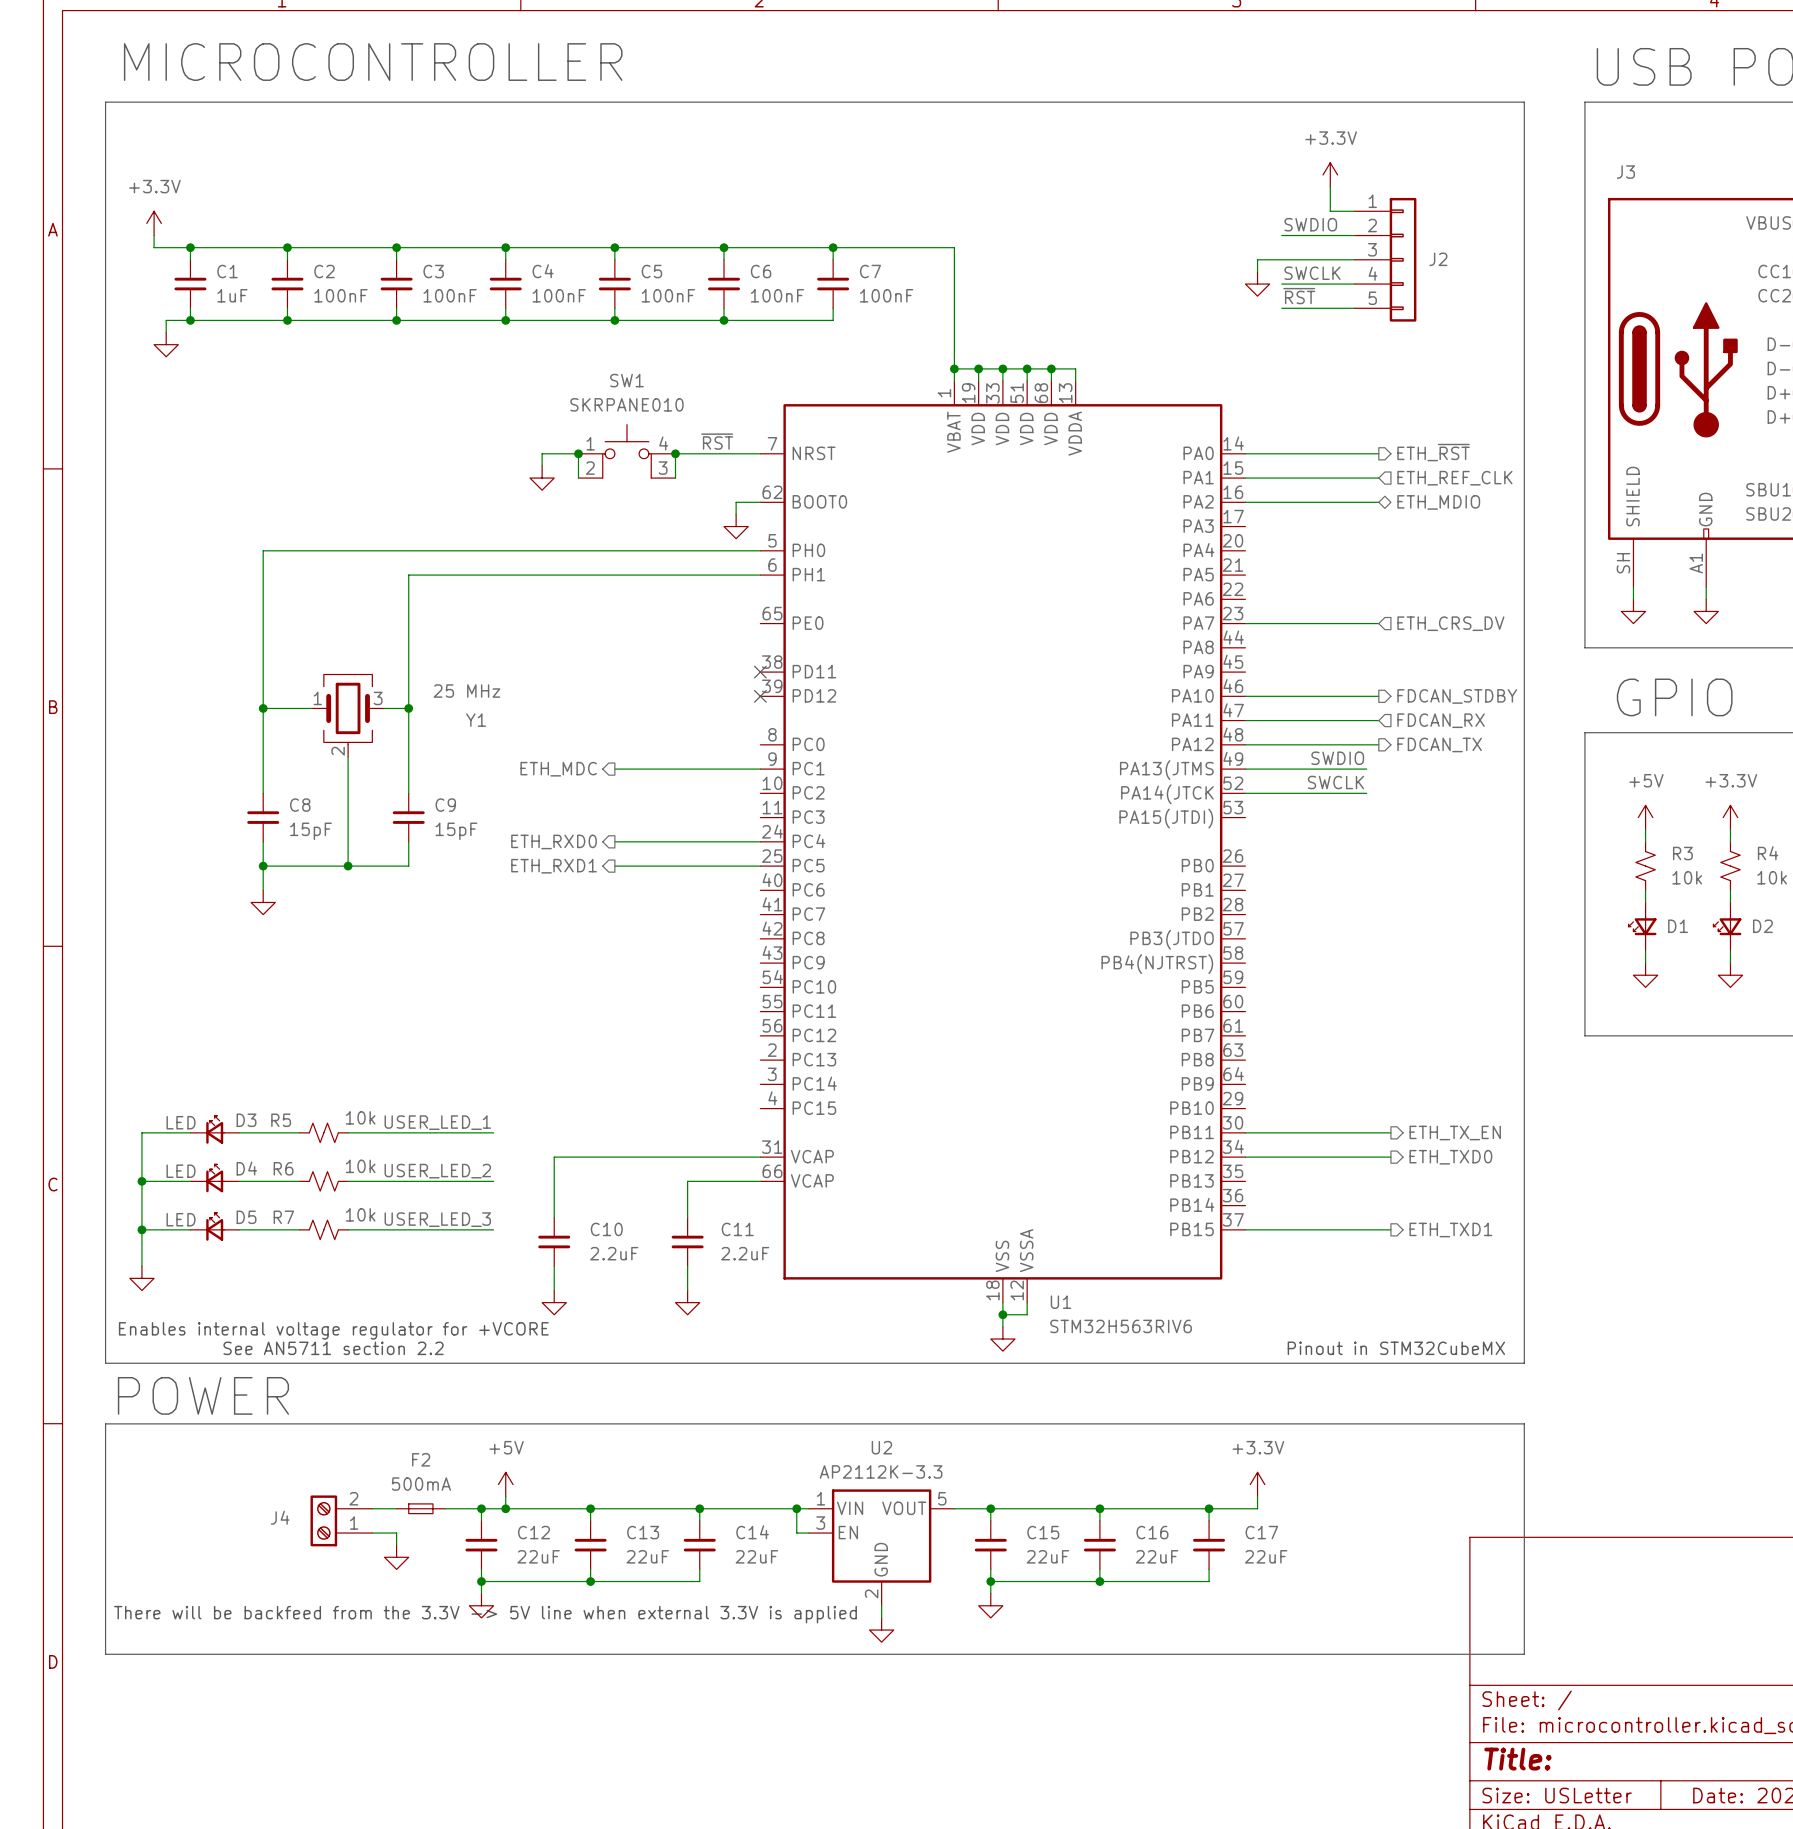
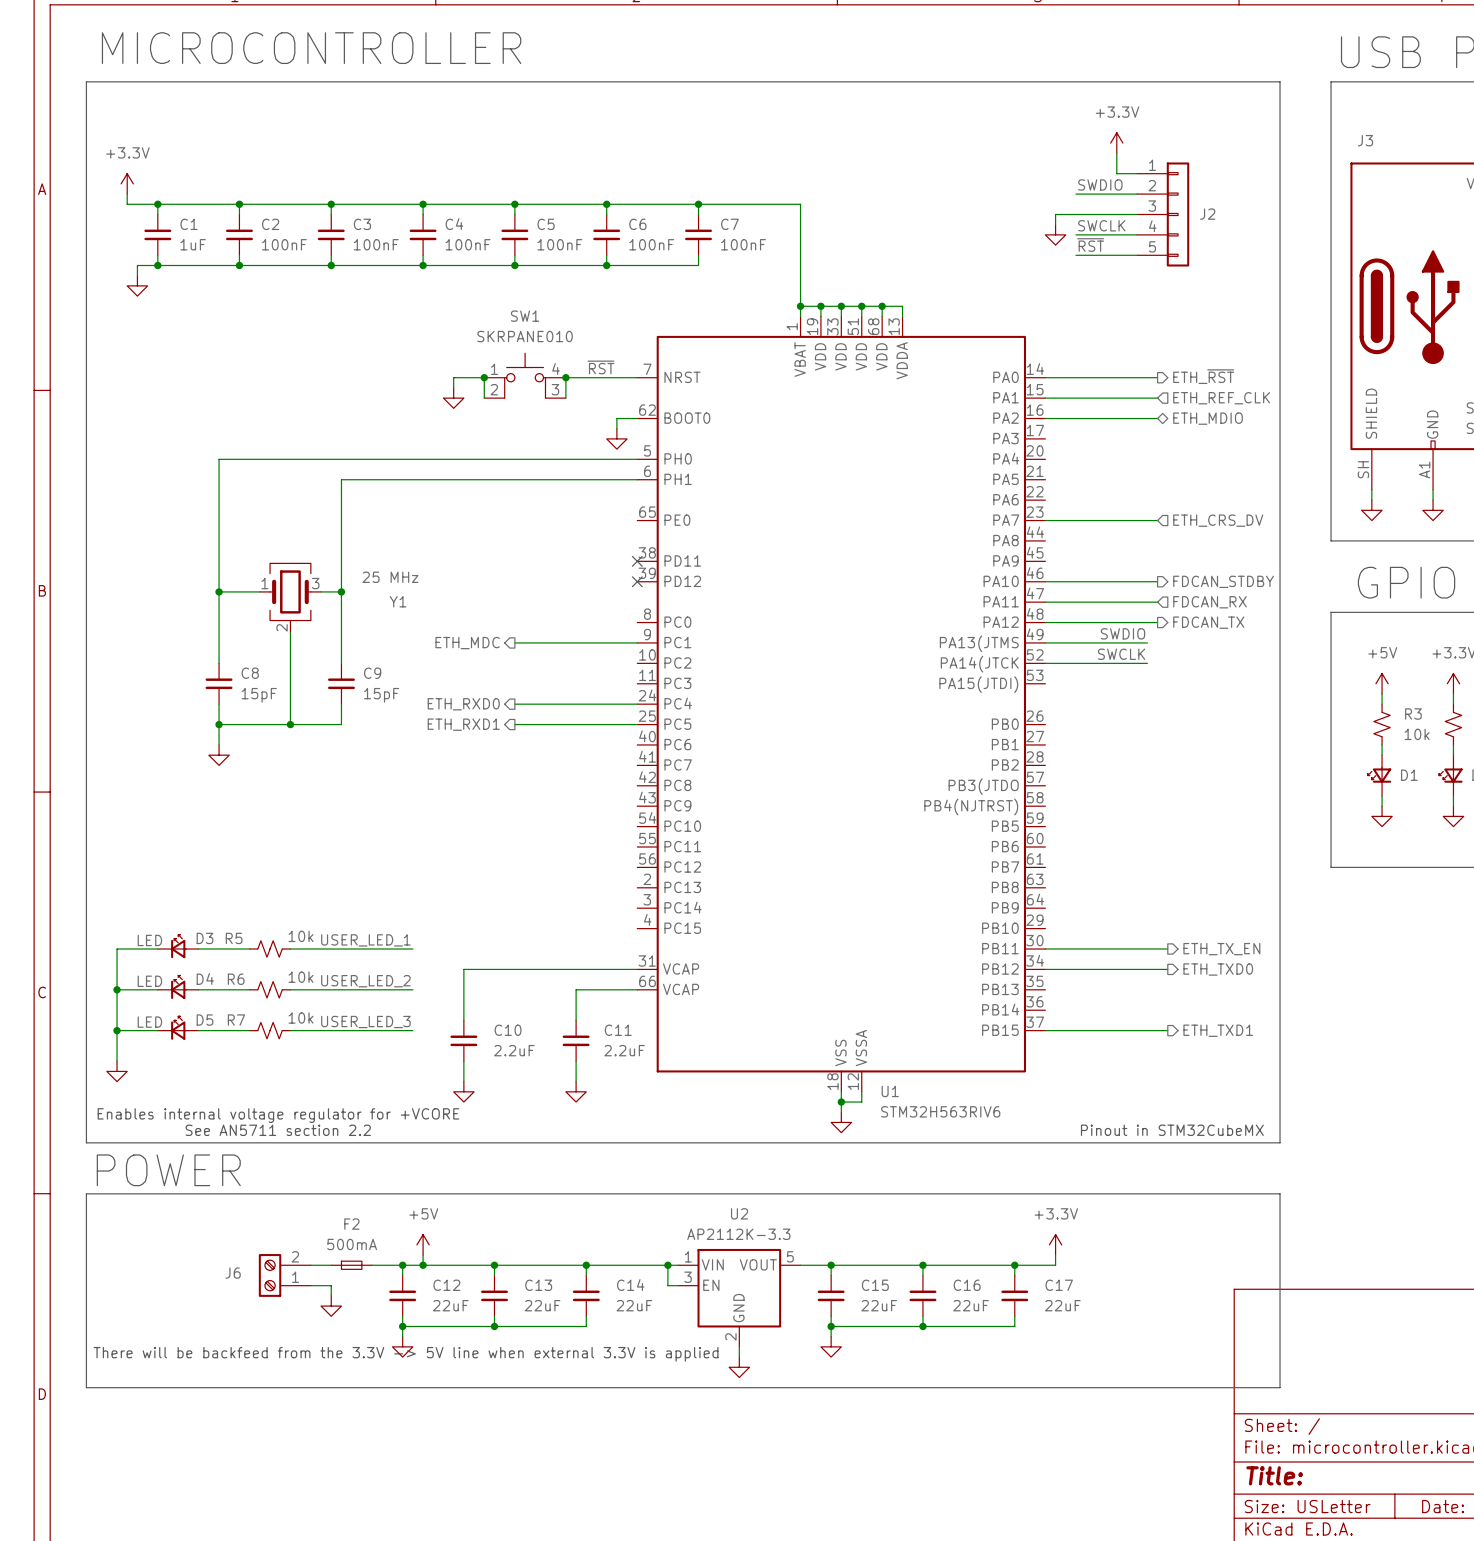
J4 name: J4 (280, 1517) -> J6 (233, 1273)

